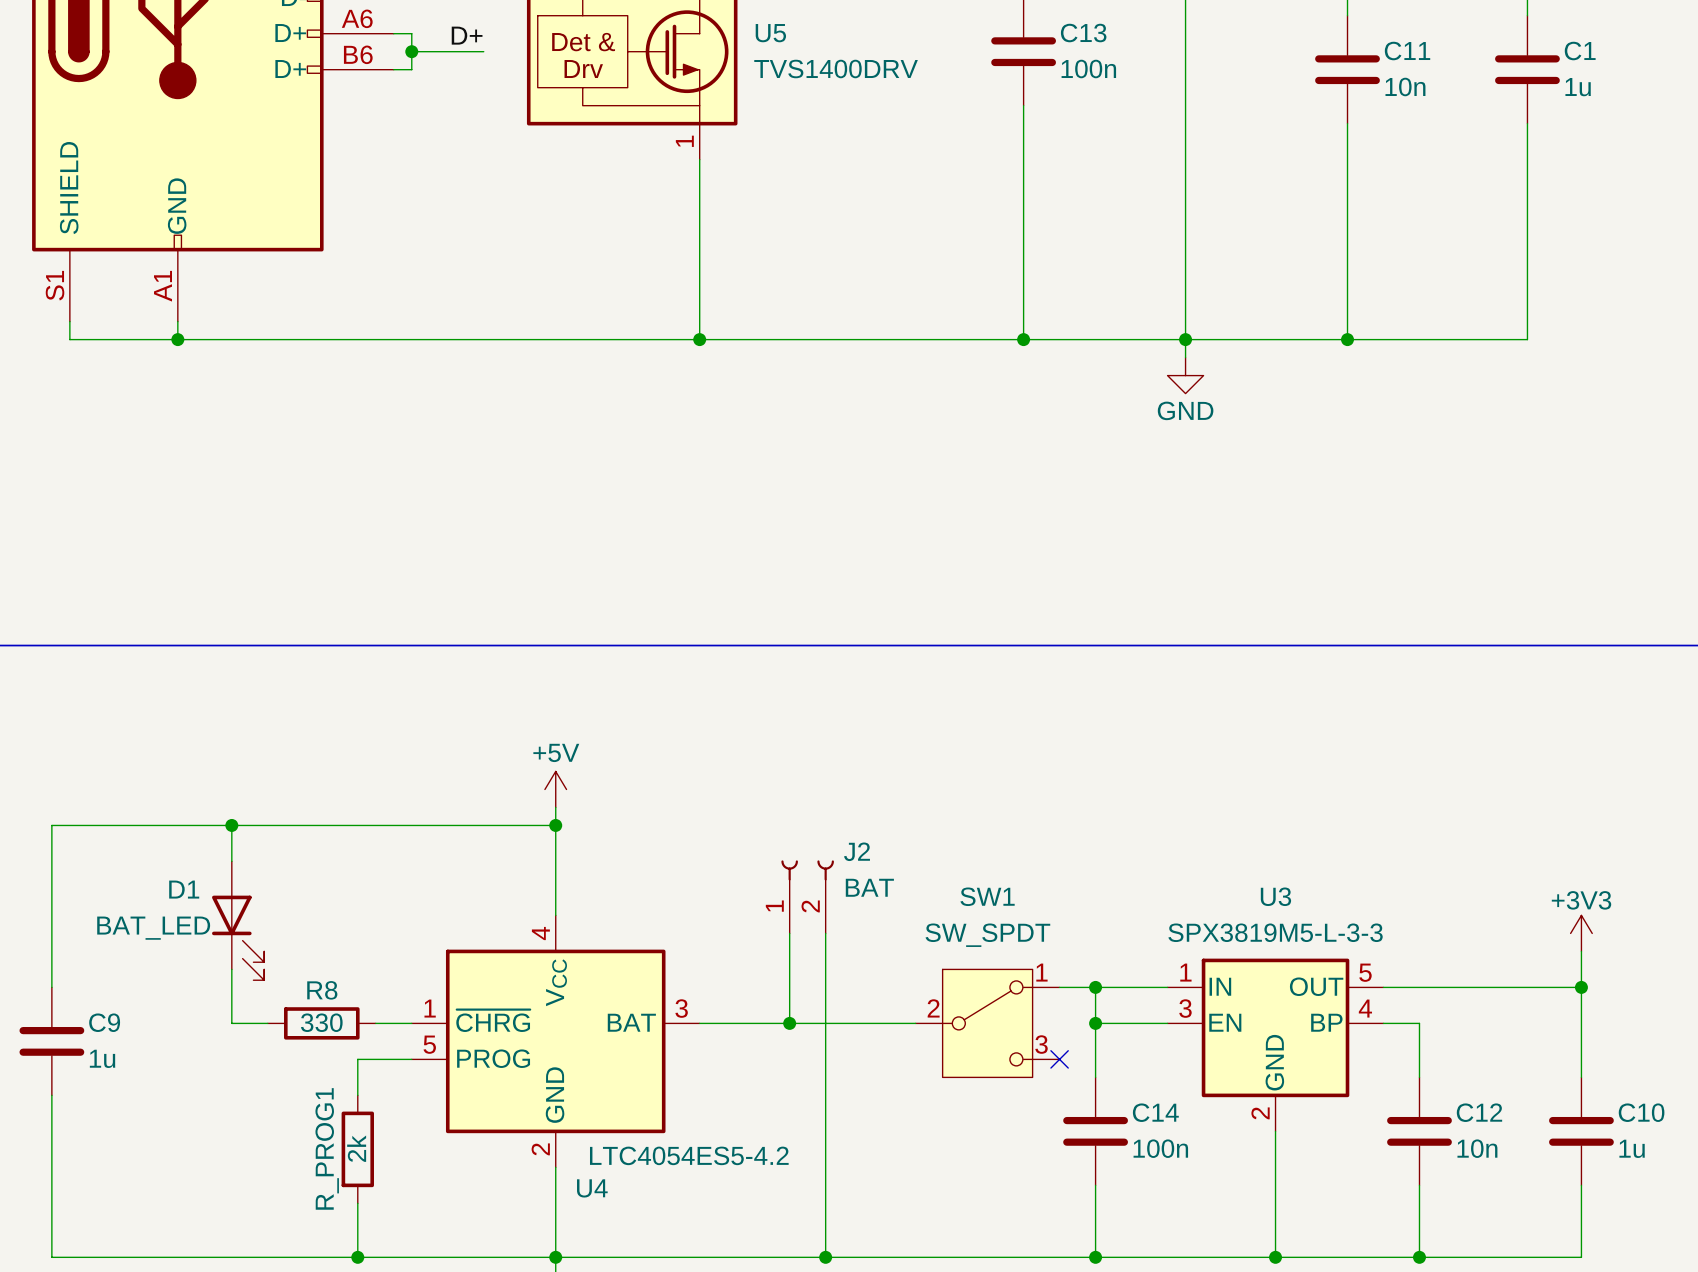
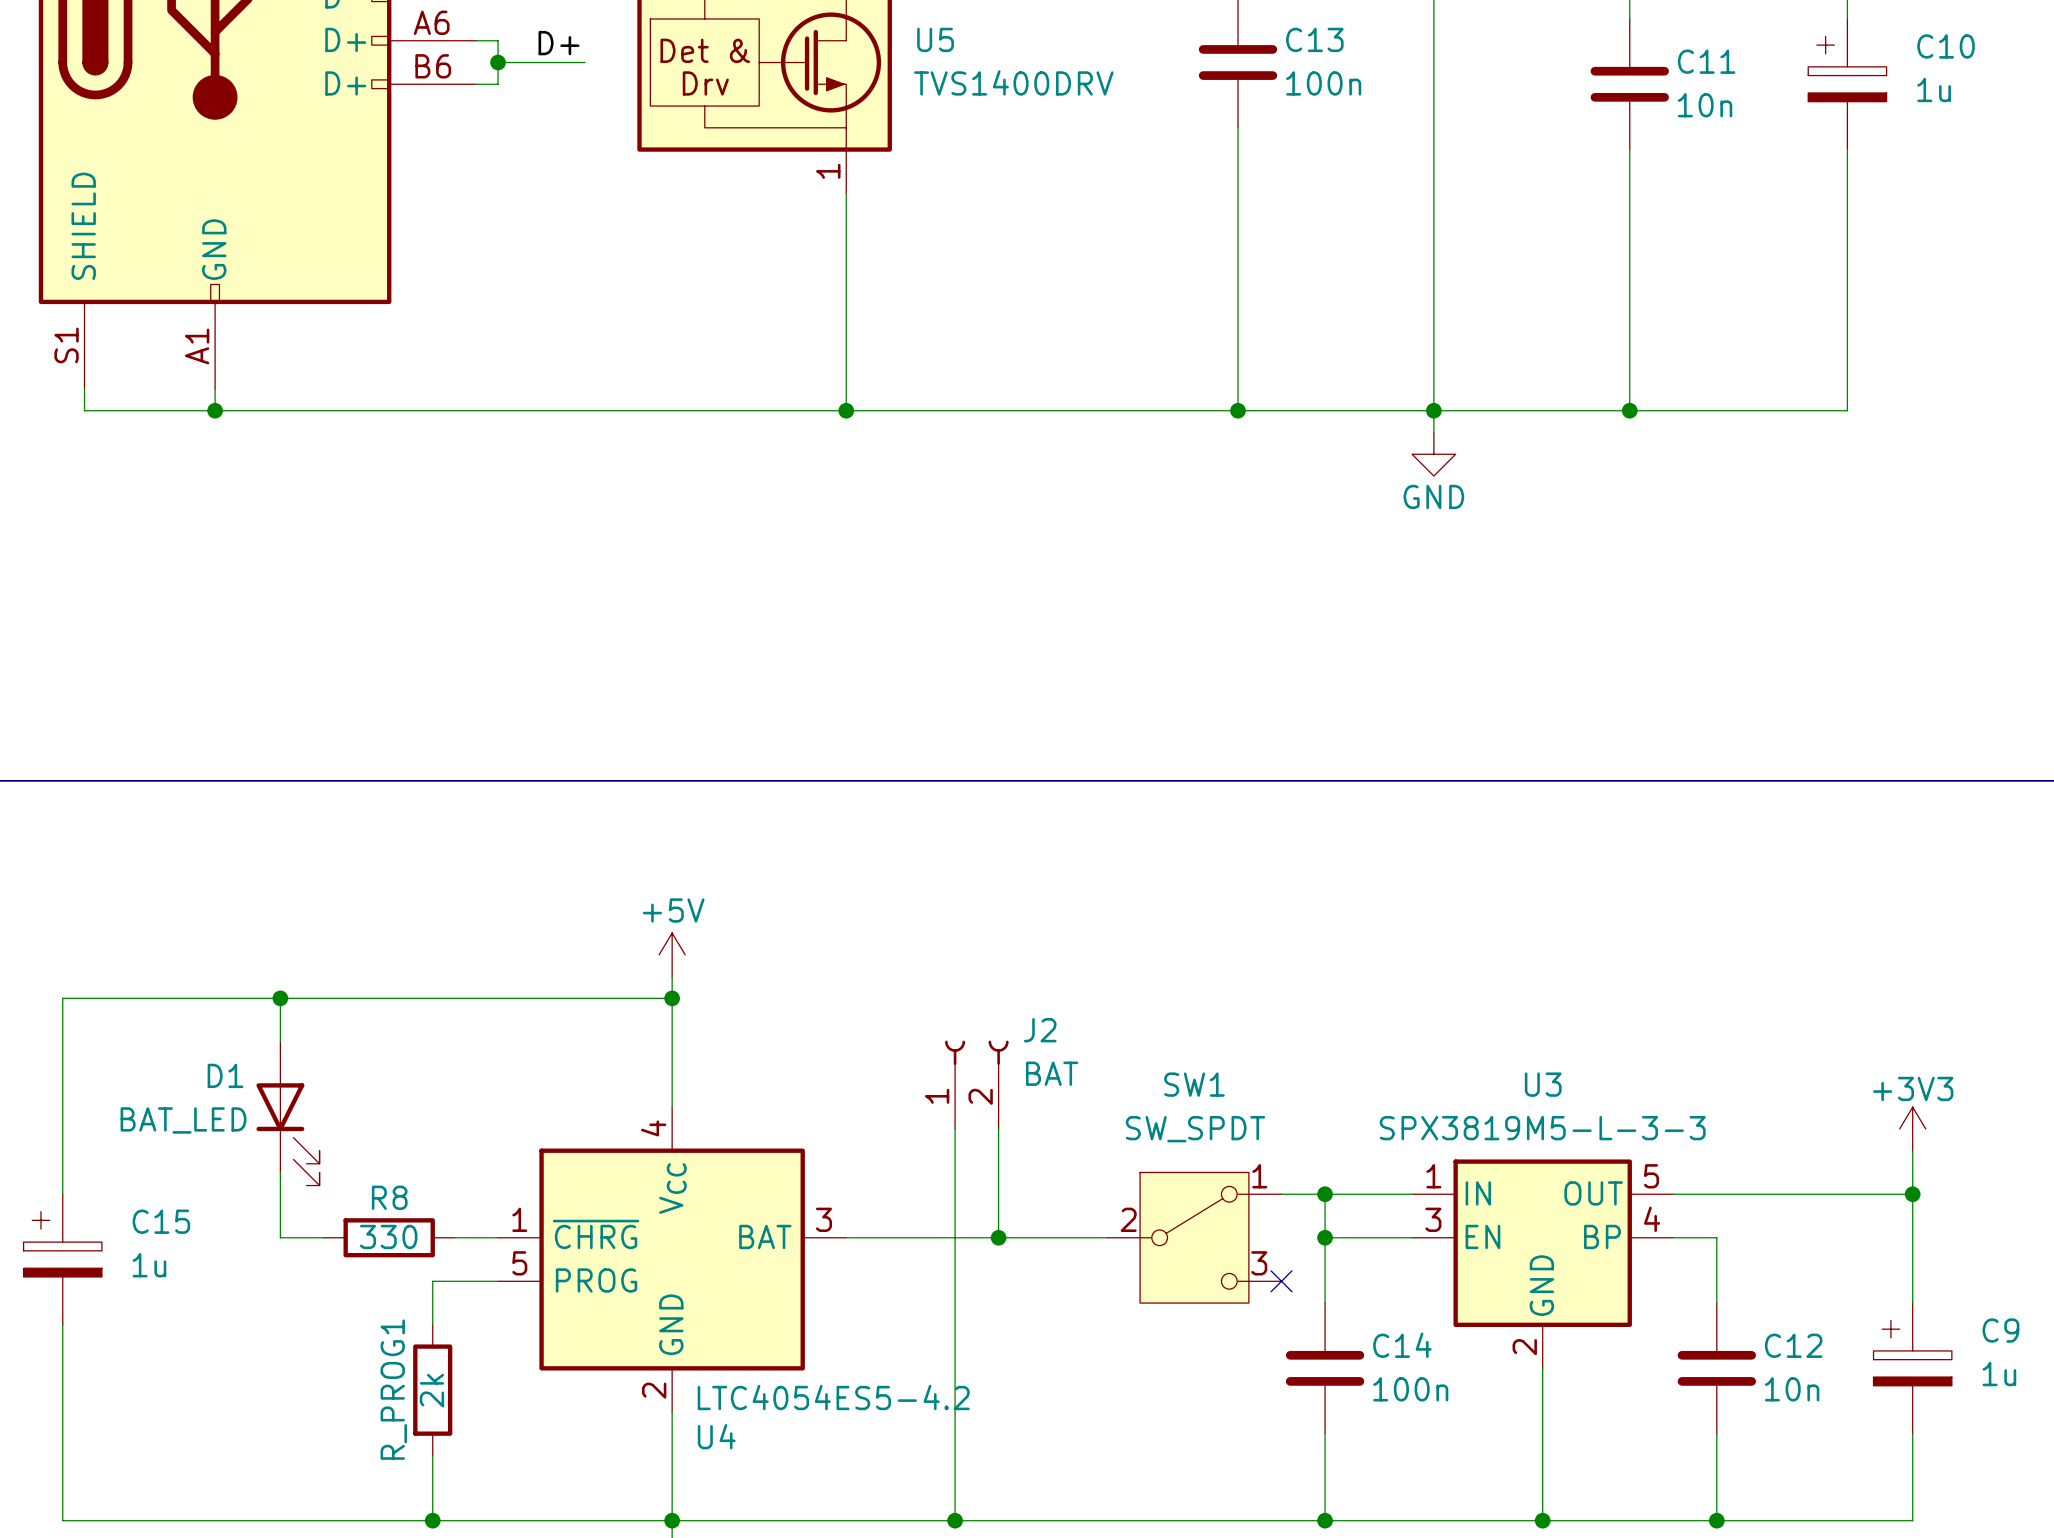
C1: 1u (1527, 69) -> none
C9 symbol: [19, 987, 85, 1096] -> [1873, 1303, 1952, 1434]
junction position: (789, 1023) -> (998, 1237)
wire: (825, 1023) (825, 1257) -> (955, 1237) (955, 1520)
C15: none -> 1u (62, 1259)
C10 symbol: [1549, 1077, 1614, 1186] -> [1808, 18, 1887, 150]
junction position: (825, 1257) -> (955, 1520)

